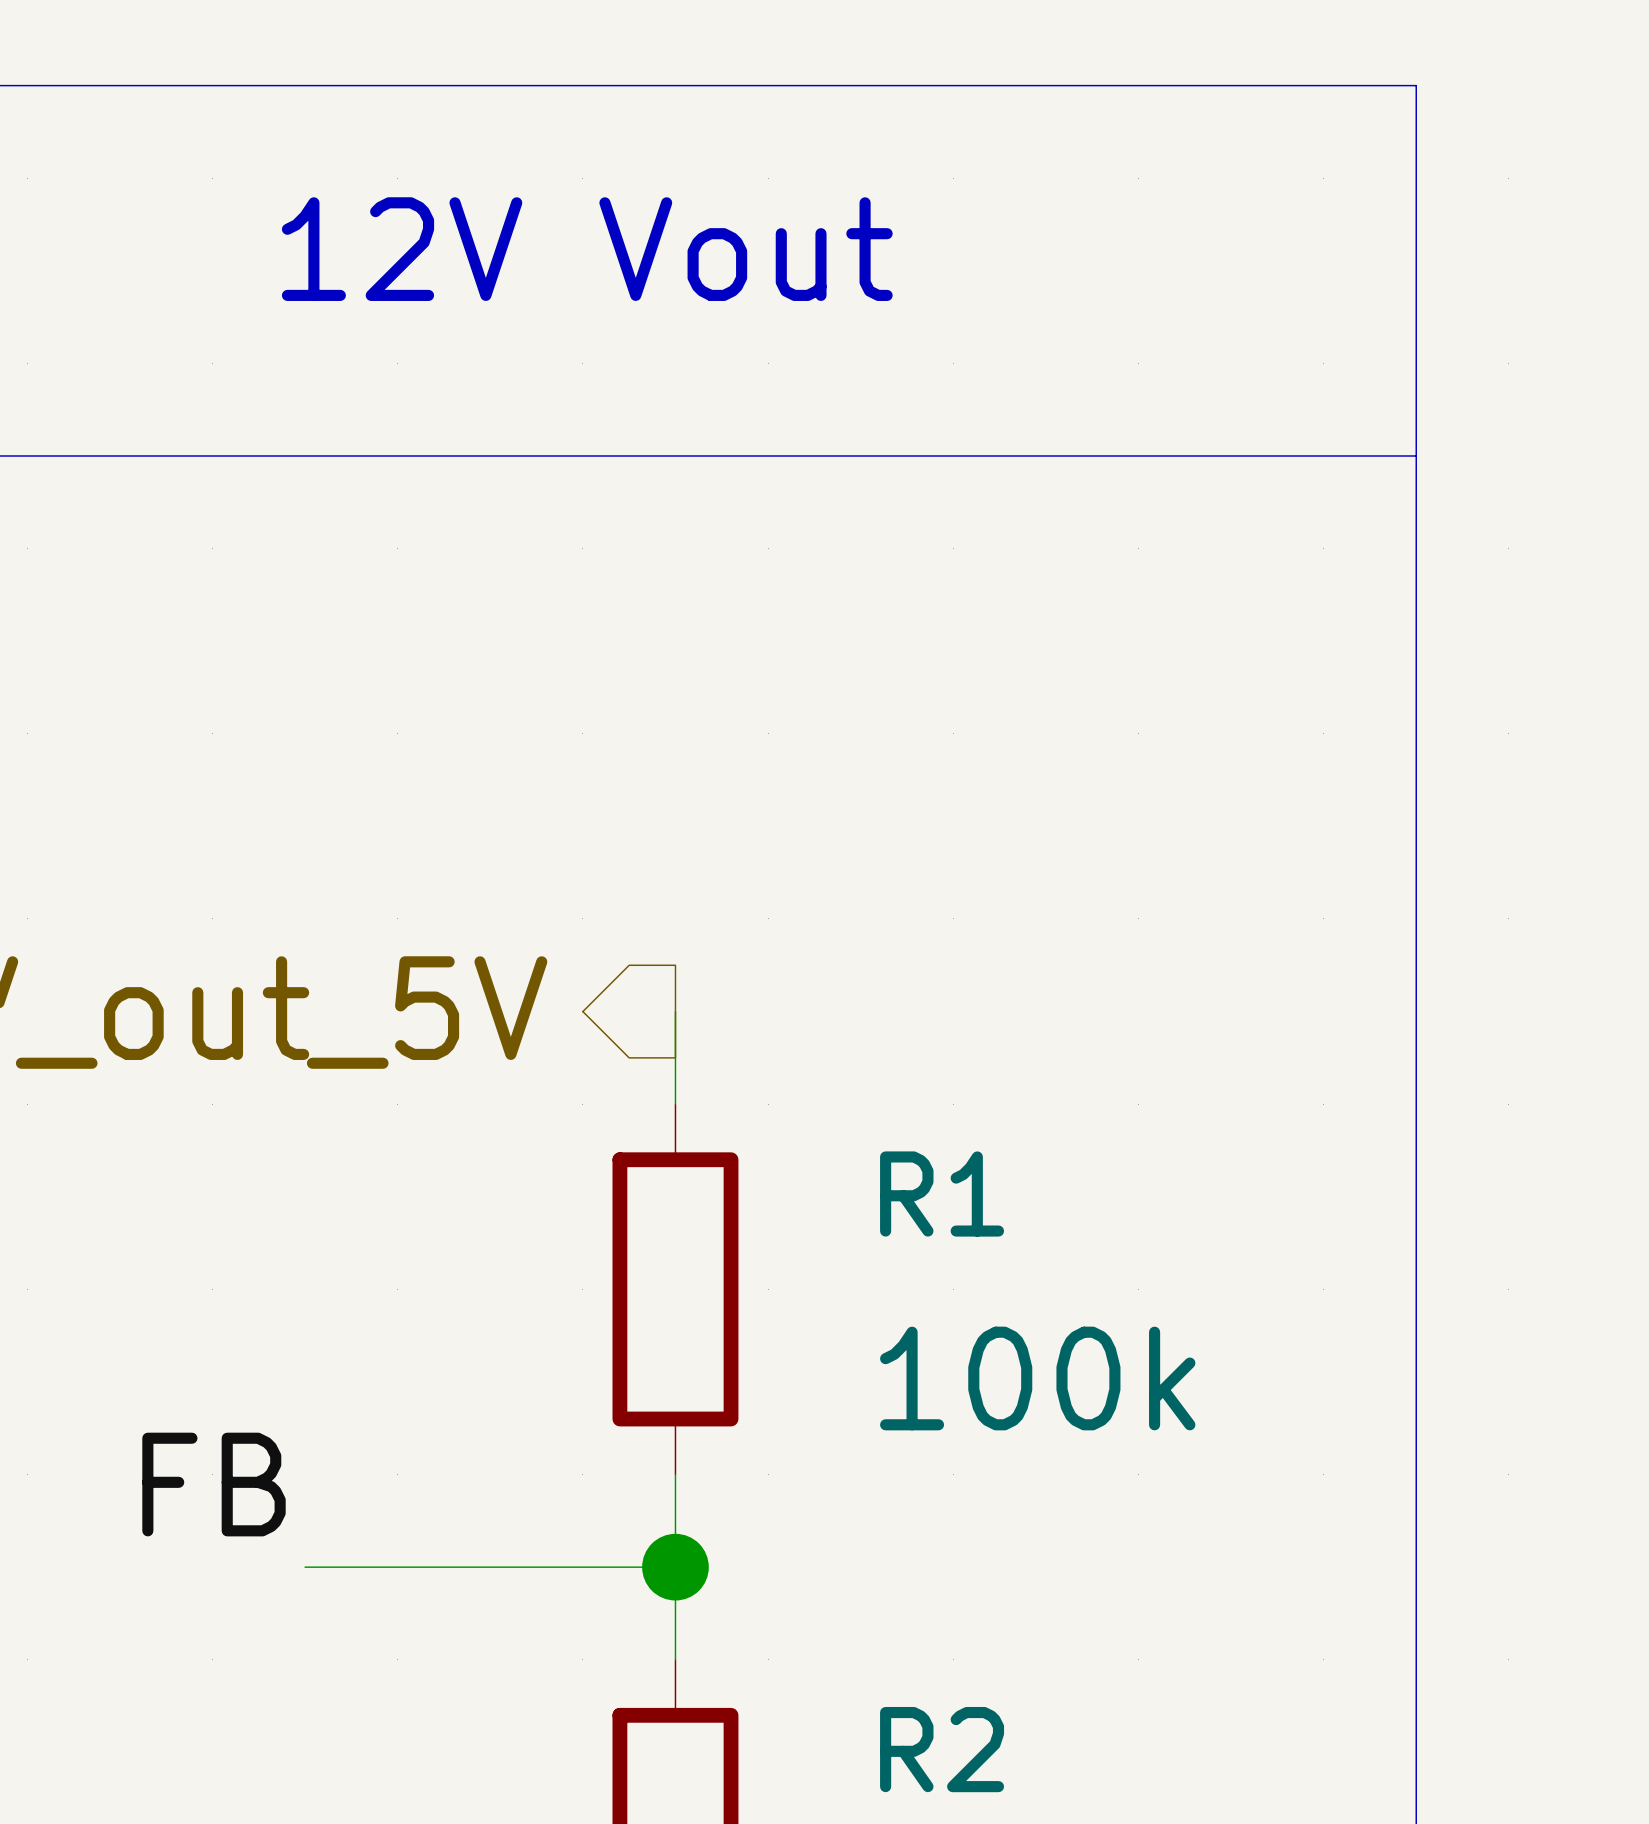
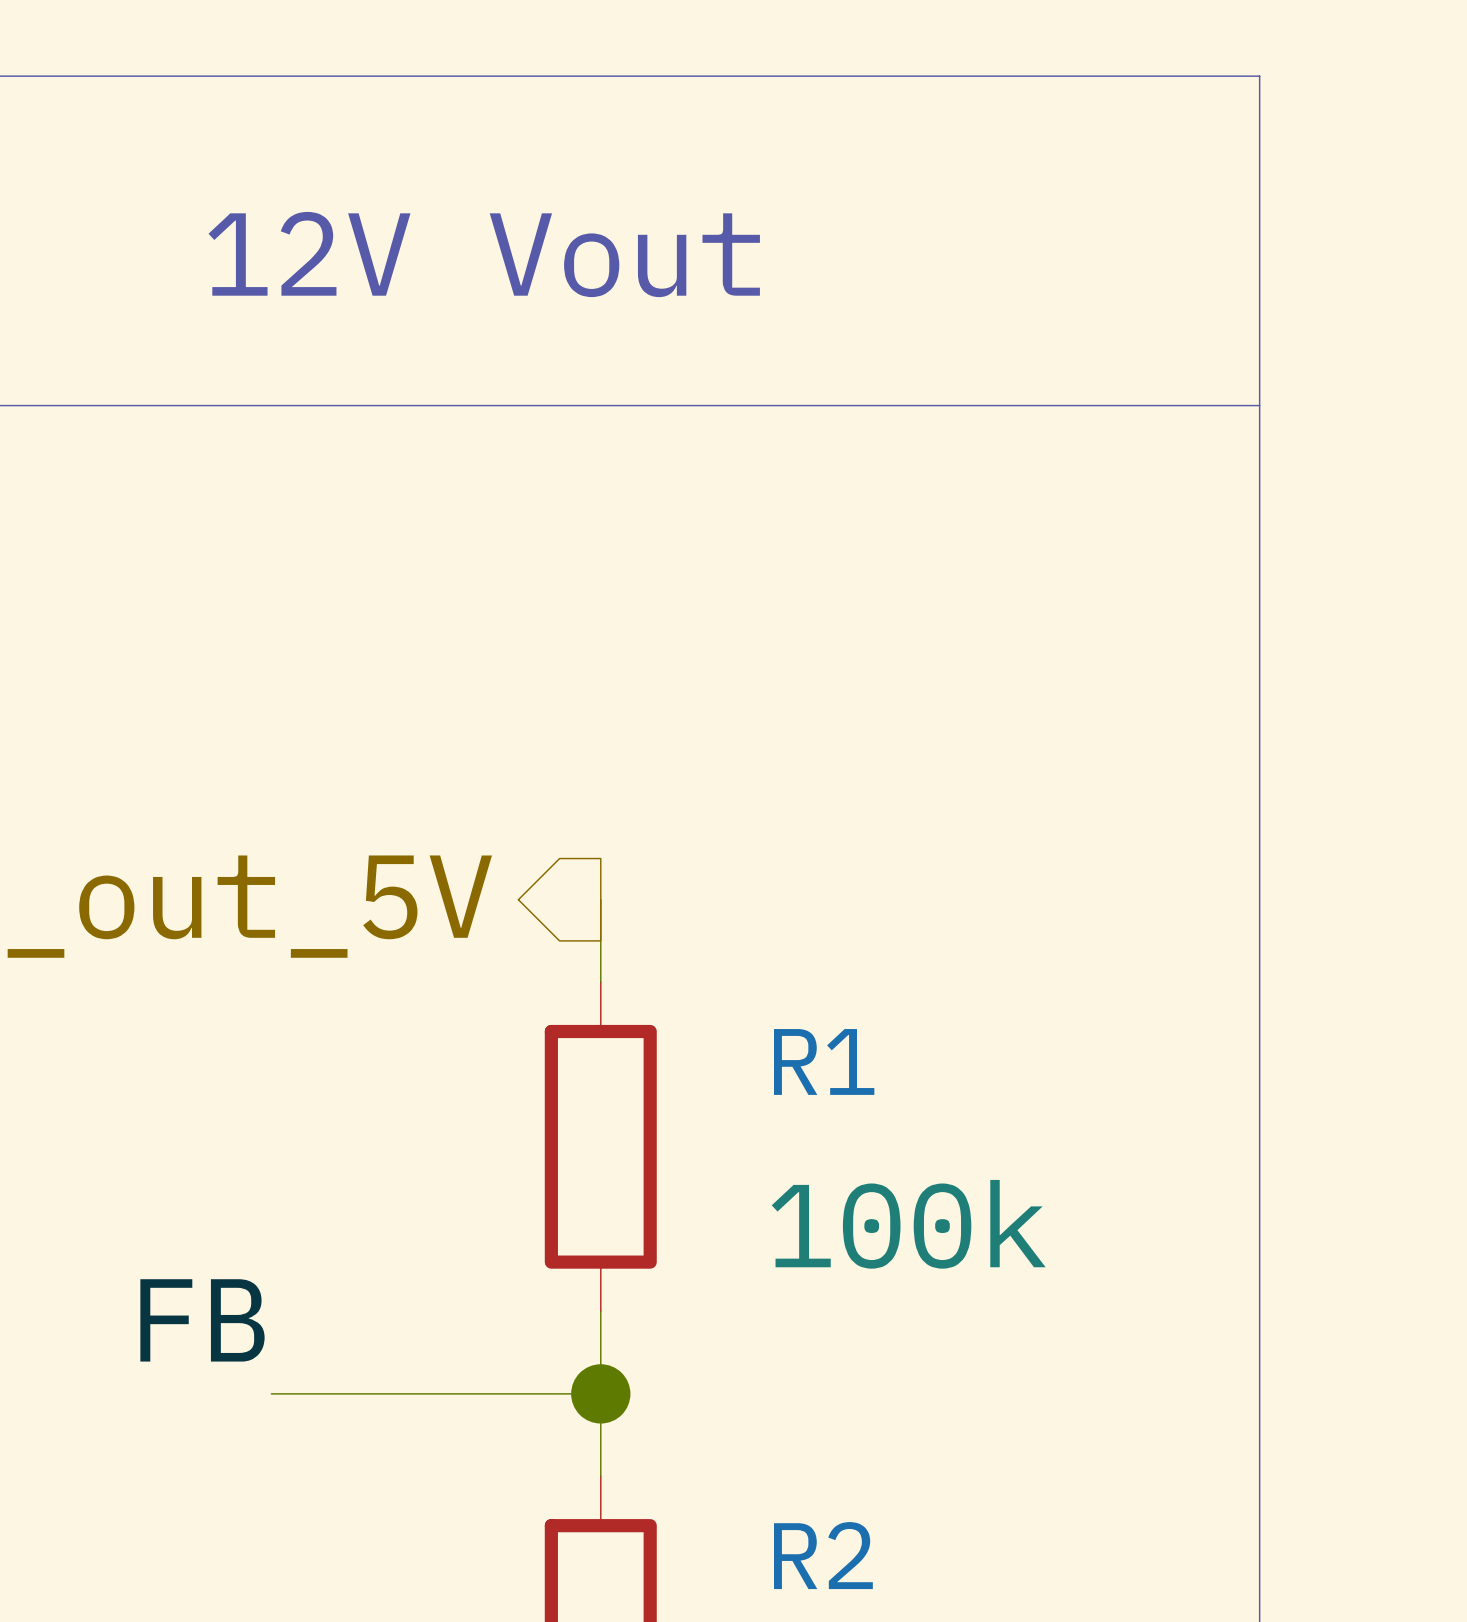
text position: 12V Vout (587, 249) -> 12V Vout (484, 254)

